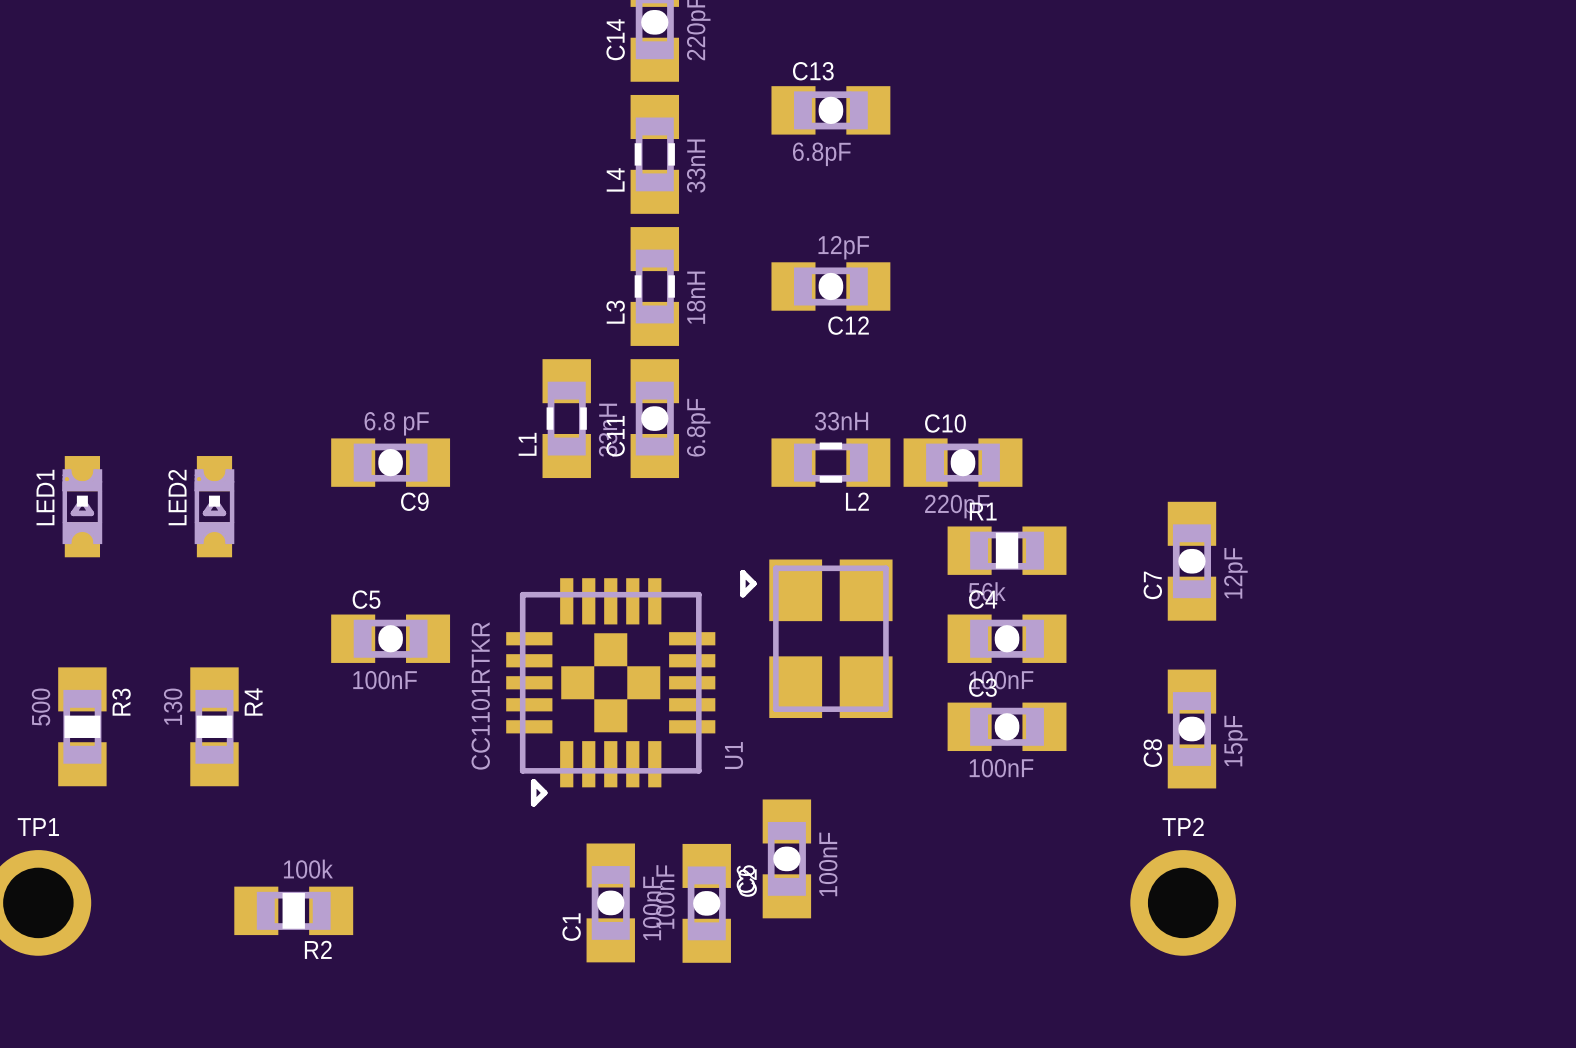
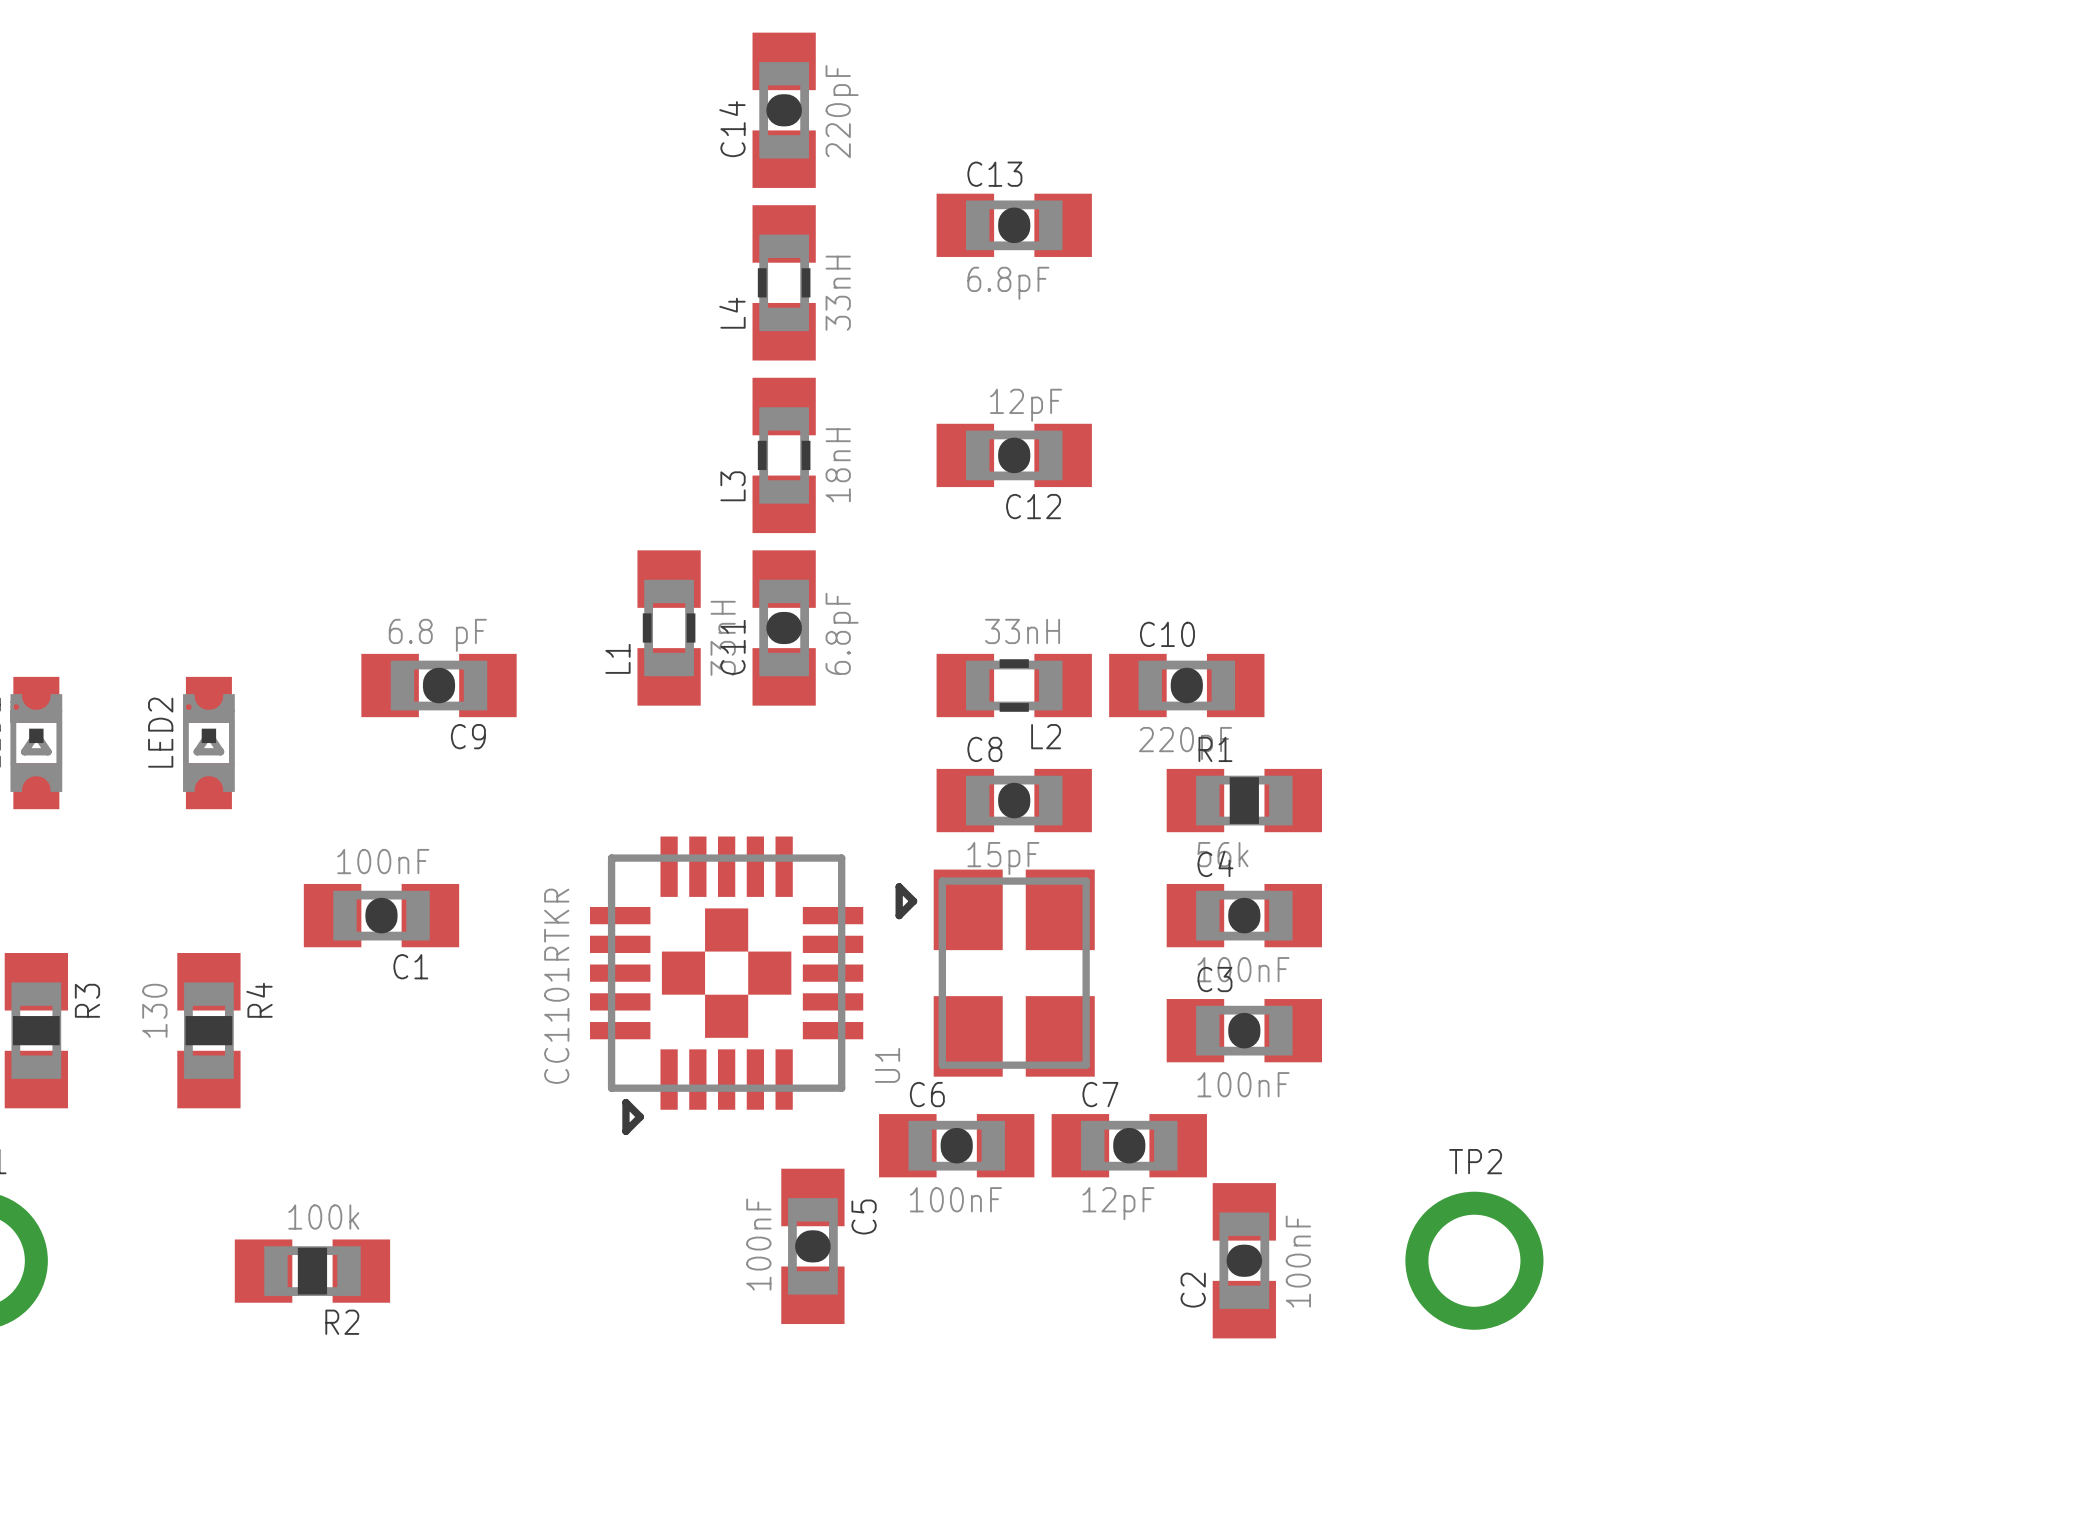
C7 rotation: 0° (1191, 561) -> 90° clockwise (1129, 1145)
C7 position: (1191, 561) -> (1129, 1145)
C5 rotation: 0° (390, 638) -> 90° clockwise (812, 1246)
C5 position: (390, 638) -> (812, 1246)
part position: (816, 638) -> (995, 973)
C8 rotation: 0° (1191, 729) -> 90° clockwise (1014, 800)
C8 position: (1191, 729) -> (1014, 800)
C2 position: (786, 858) -> (1244, 1260)
C1 rotation: 0° (610, 902) -> 90° clockwise (381, 915)
C1 position: (610, 902) -> (381, 915)
C6 rotation: 0° (706, 903) -> 90° clockwise (956, 1145)
C6 position: (706, 903) -> (956, 1145)

